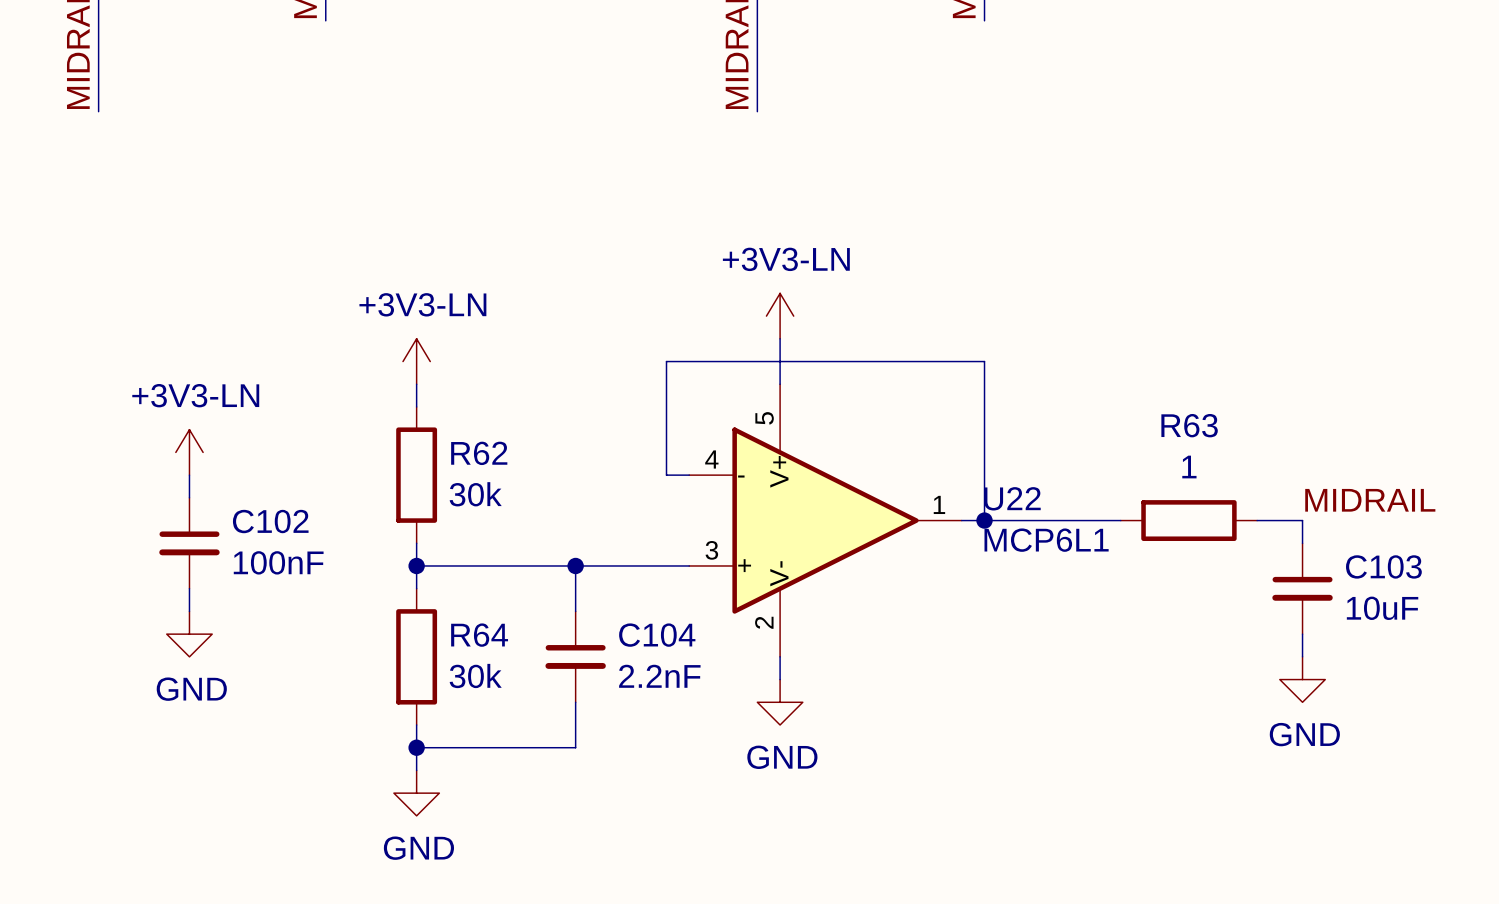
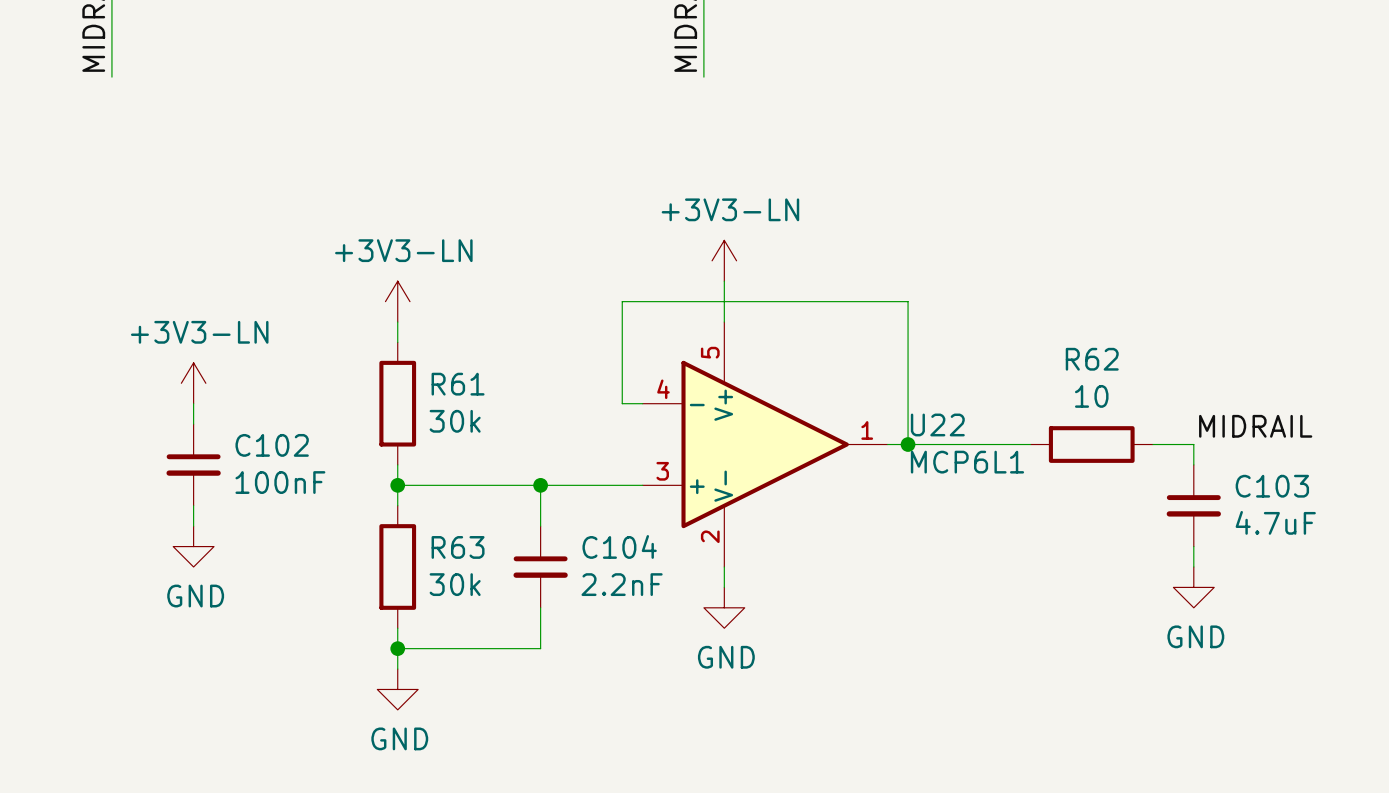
R63 name: R63 (1189, 425) -> R62 (1092, 359)
R62 name: R62 (479, 453) -> R61 (458, 384)
R63 value: 1 (1189, 467) -> 10 (1091, 396)
C103 value: 10uF (1382, 608) -> 4.7uF (1275, 522)
R64 name: R64 (479, 635) -> R63 (458, 547)

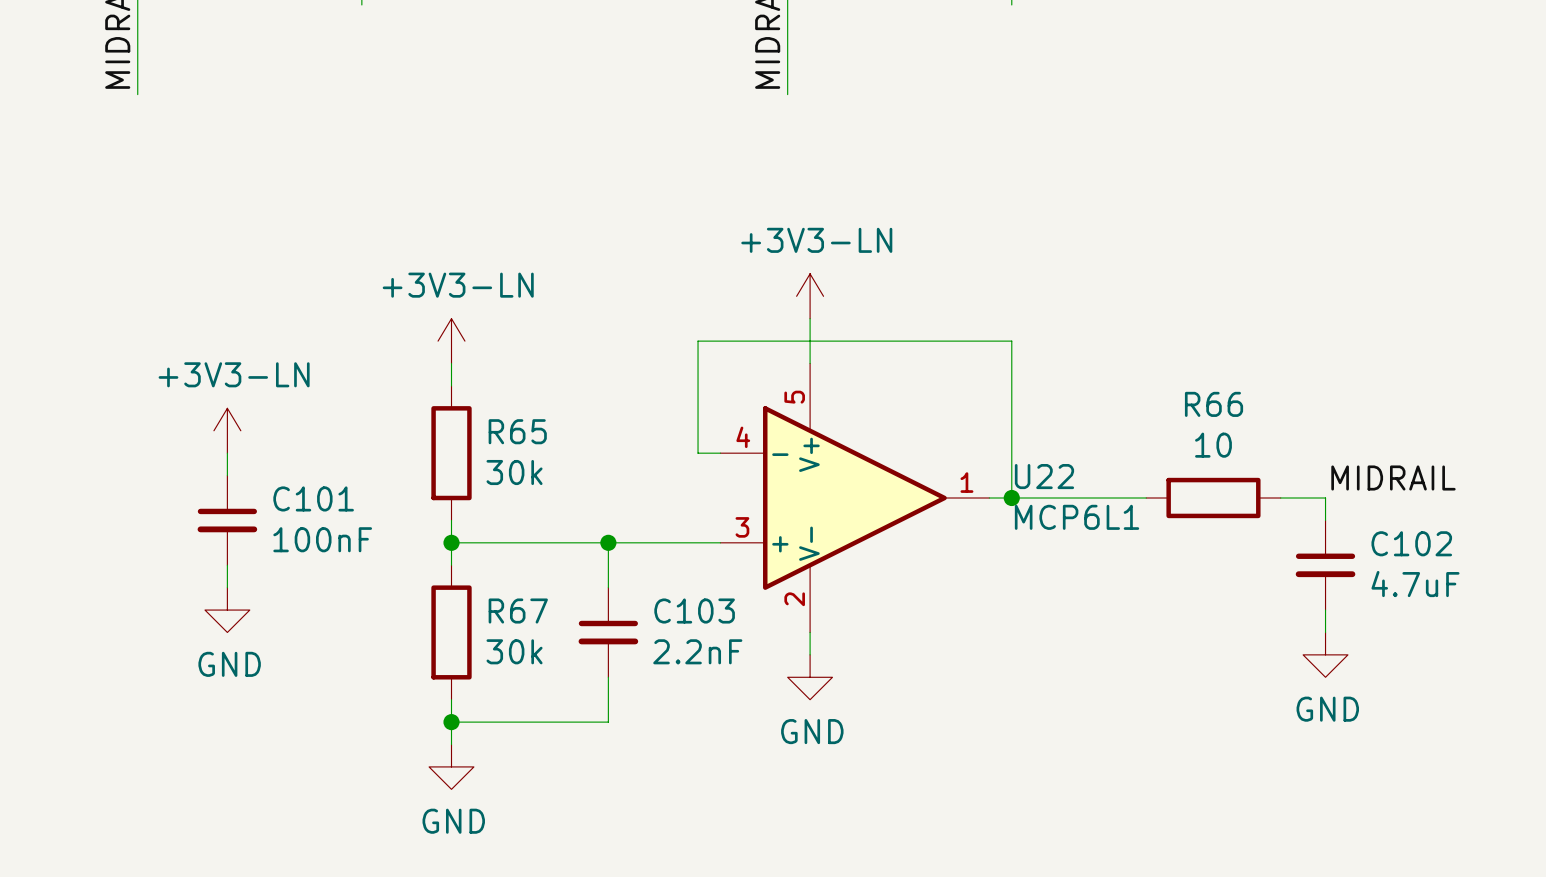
R62 name: R62 (1092, 359) -> R66 (1214, 404)
R61 name: R61 (458, 384) -> R65 (517, 431)
C102 name: C102 (272, 445) -> C101 (313, 498)
C103 name: C103 (1272, 486) -> C102 (1411, 543)
C104 name: C104 (619, 546) -> C103 (694, 611)
R63 name: R63 (458, 547) -> R67 (518, 611)

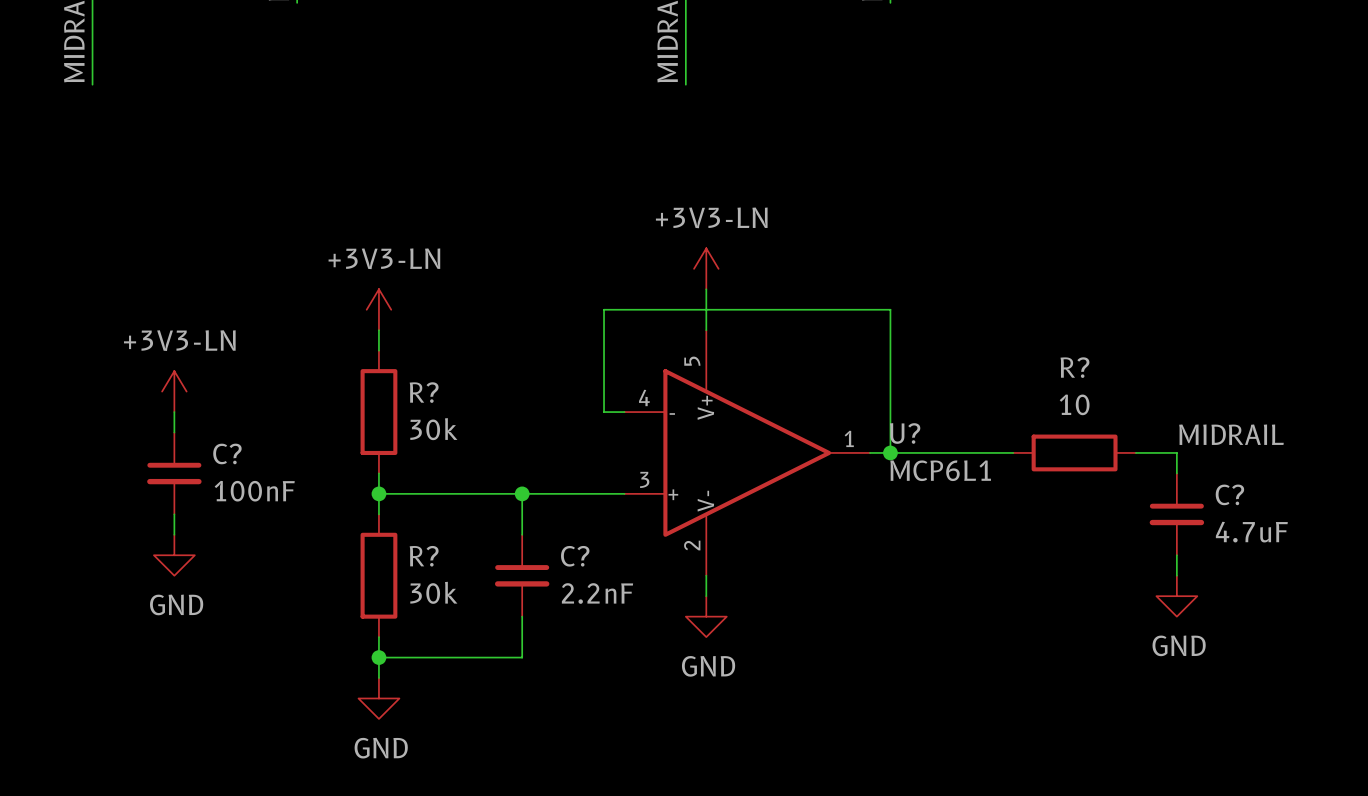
R66 name: R66 (1214, 404) -> R? (1074, 367)
R65 name: R65 (517, 431) -> R? (424, 392)
U22 name: U22 (1044, 476) -> U? (905, 433)
C101 name: C101 (313, 498) -> C? (227, 453)
C102 name: C102 (1411, 543) -> C? (1229, 494)
R67 name: R67 (518, 611) -> R? (424, 556)
C103 name: C103 (694, 611) -> C? (575, 556)

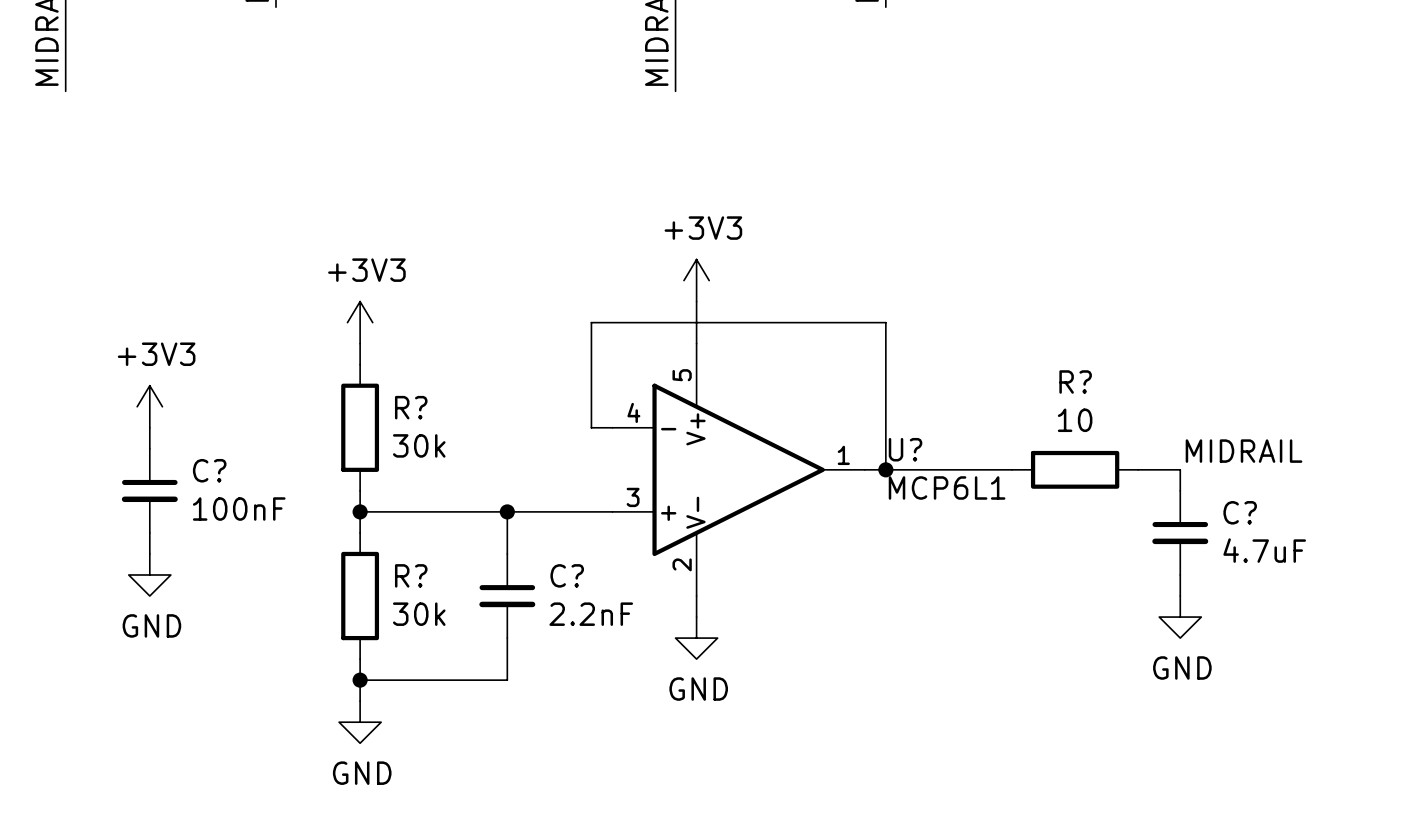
power symbol: +3V3-LN (706, 268) -> +3V3 (696, 280)
power symbol: +3V3-LN (378, 309) -> +3V3 (360, 322)
power symbol: +3V3-LN (174, 391) -> +3V3 (149, 406)

